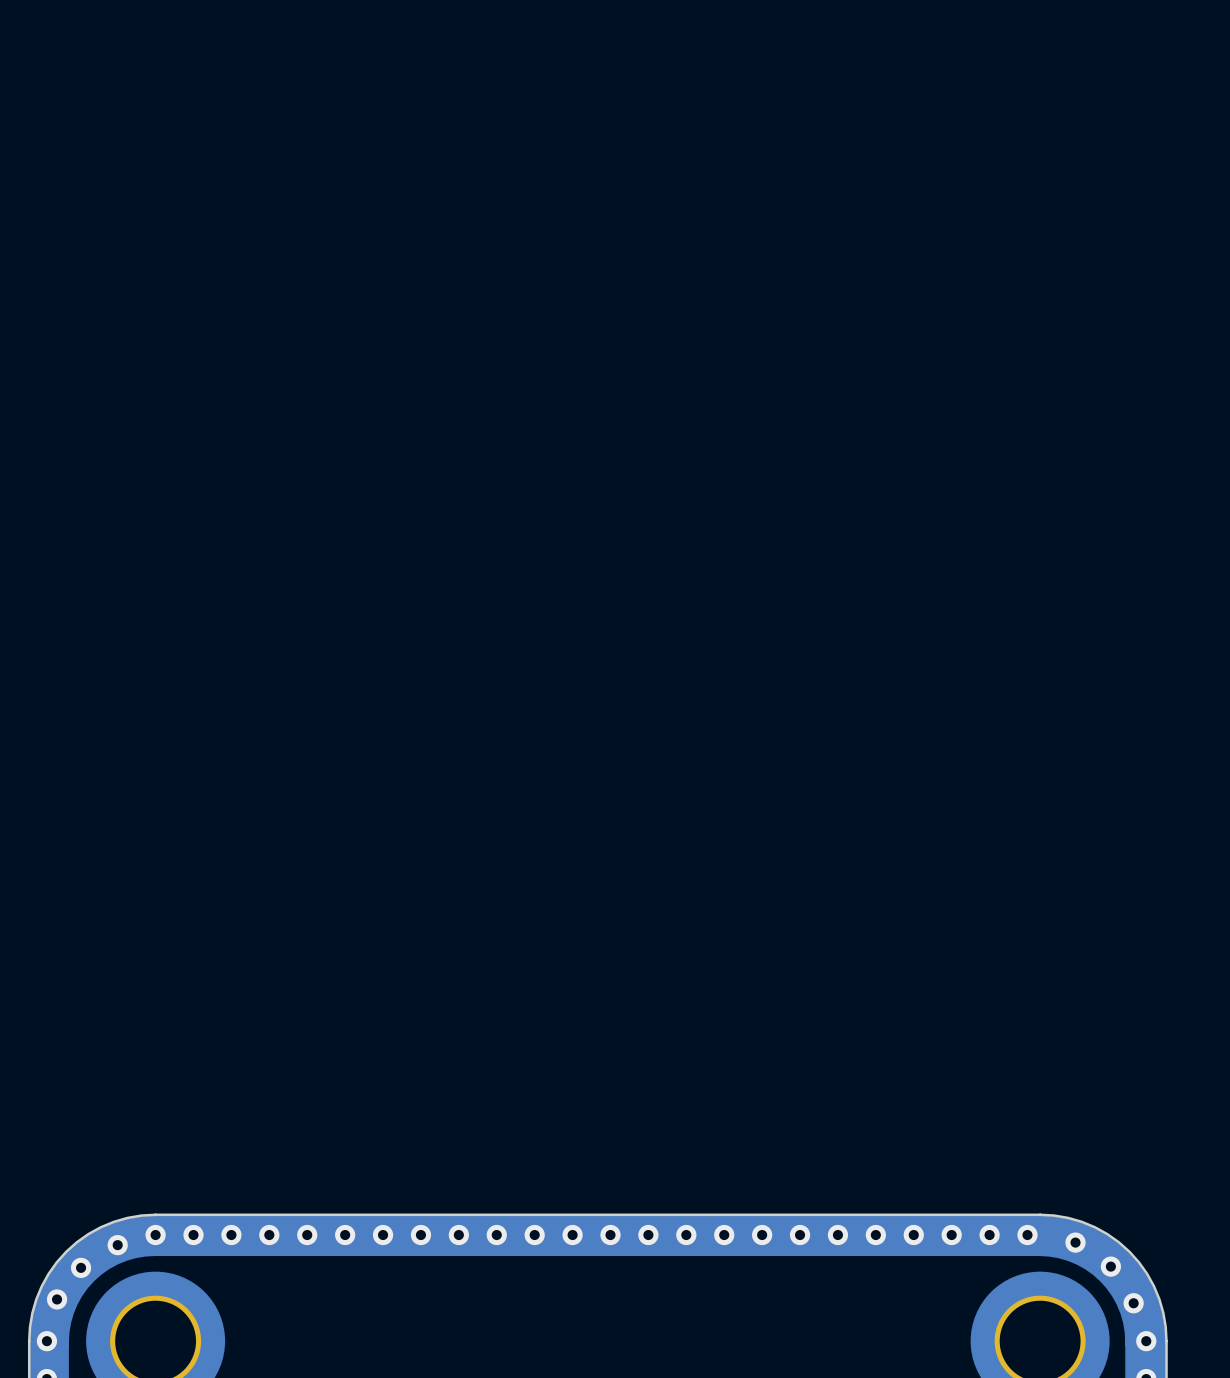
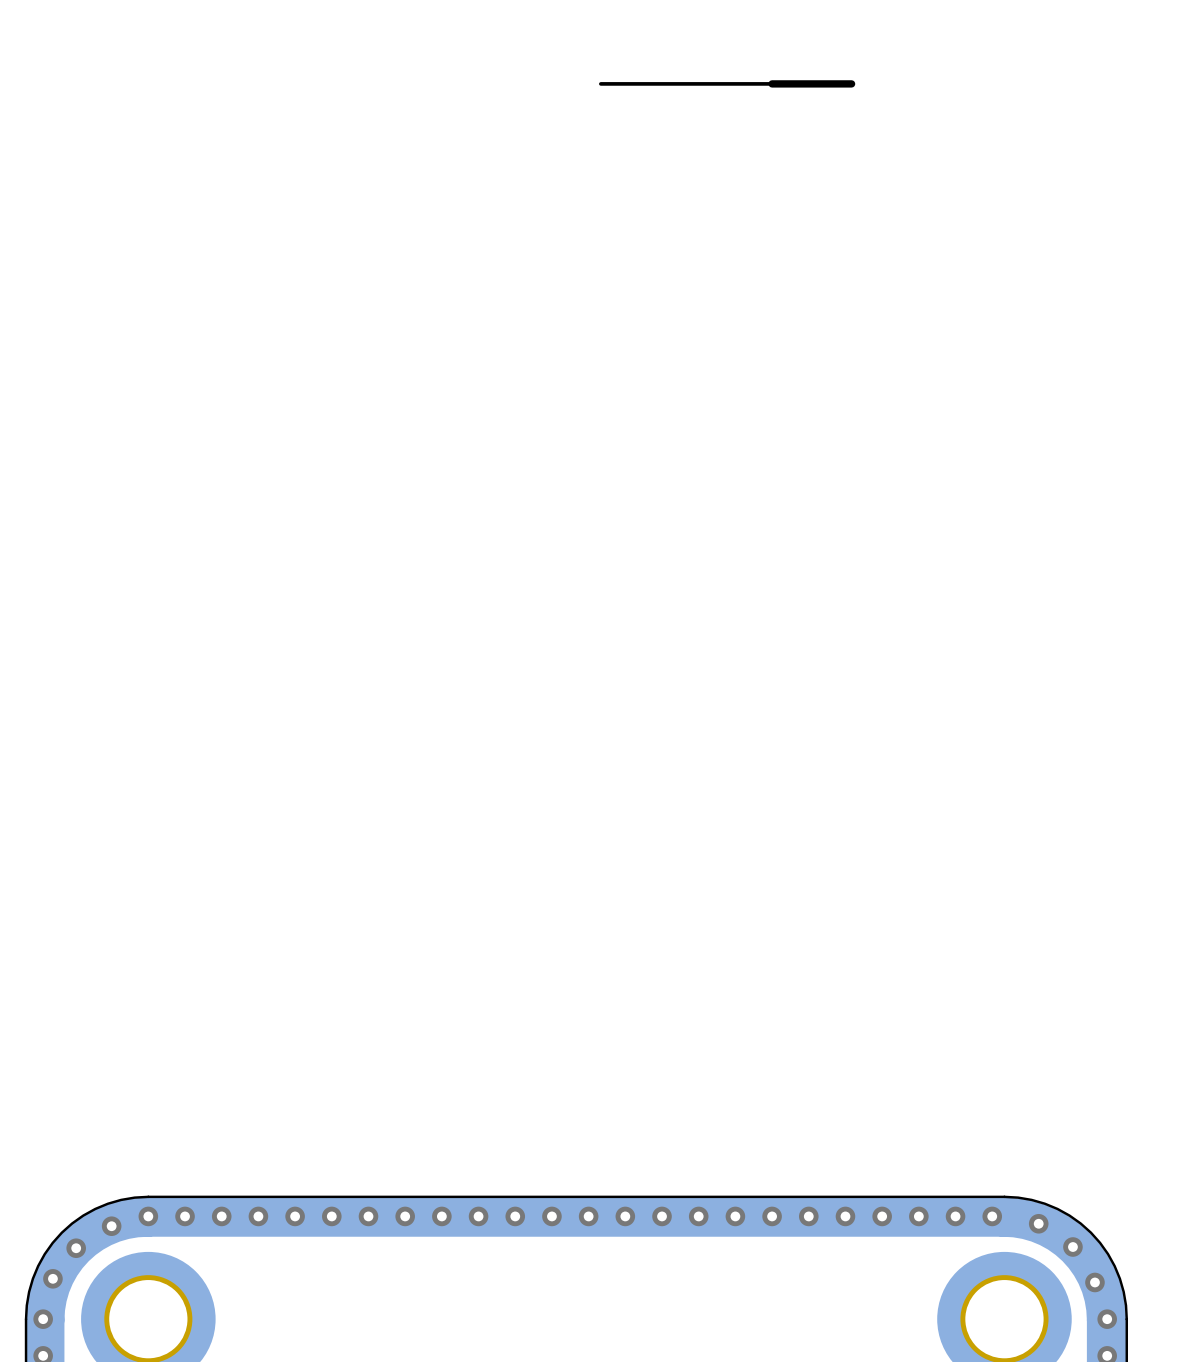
line: none -> (833, 83) (600, 83)
line: none -> (851, 83) (772, 83)

